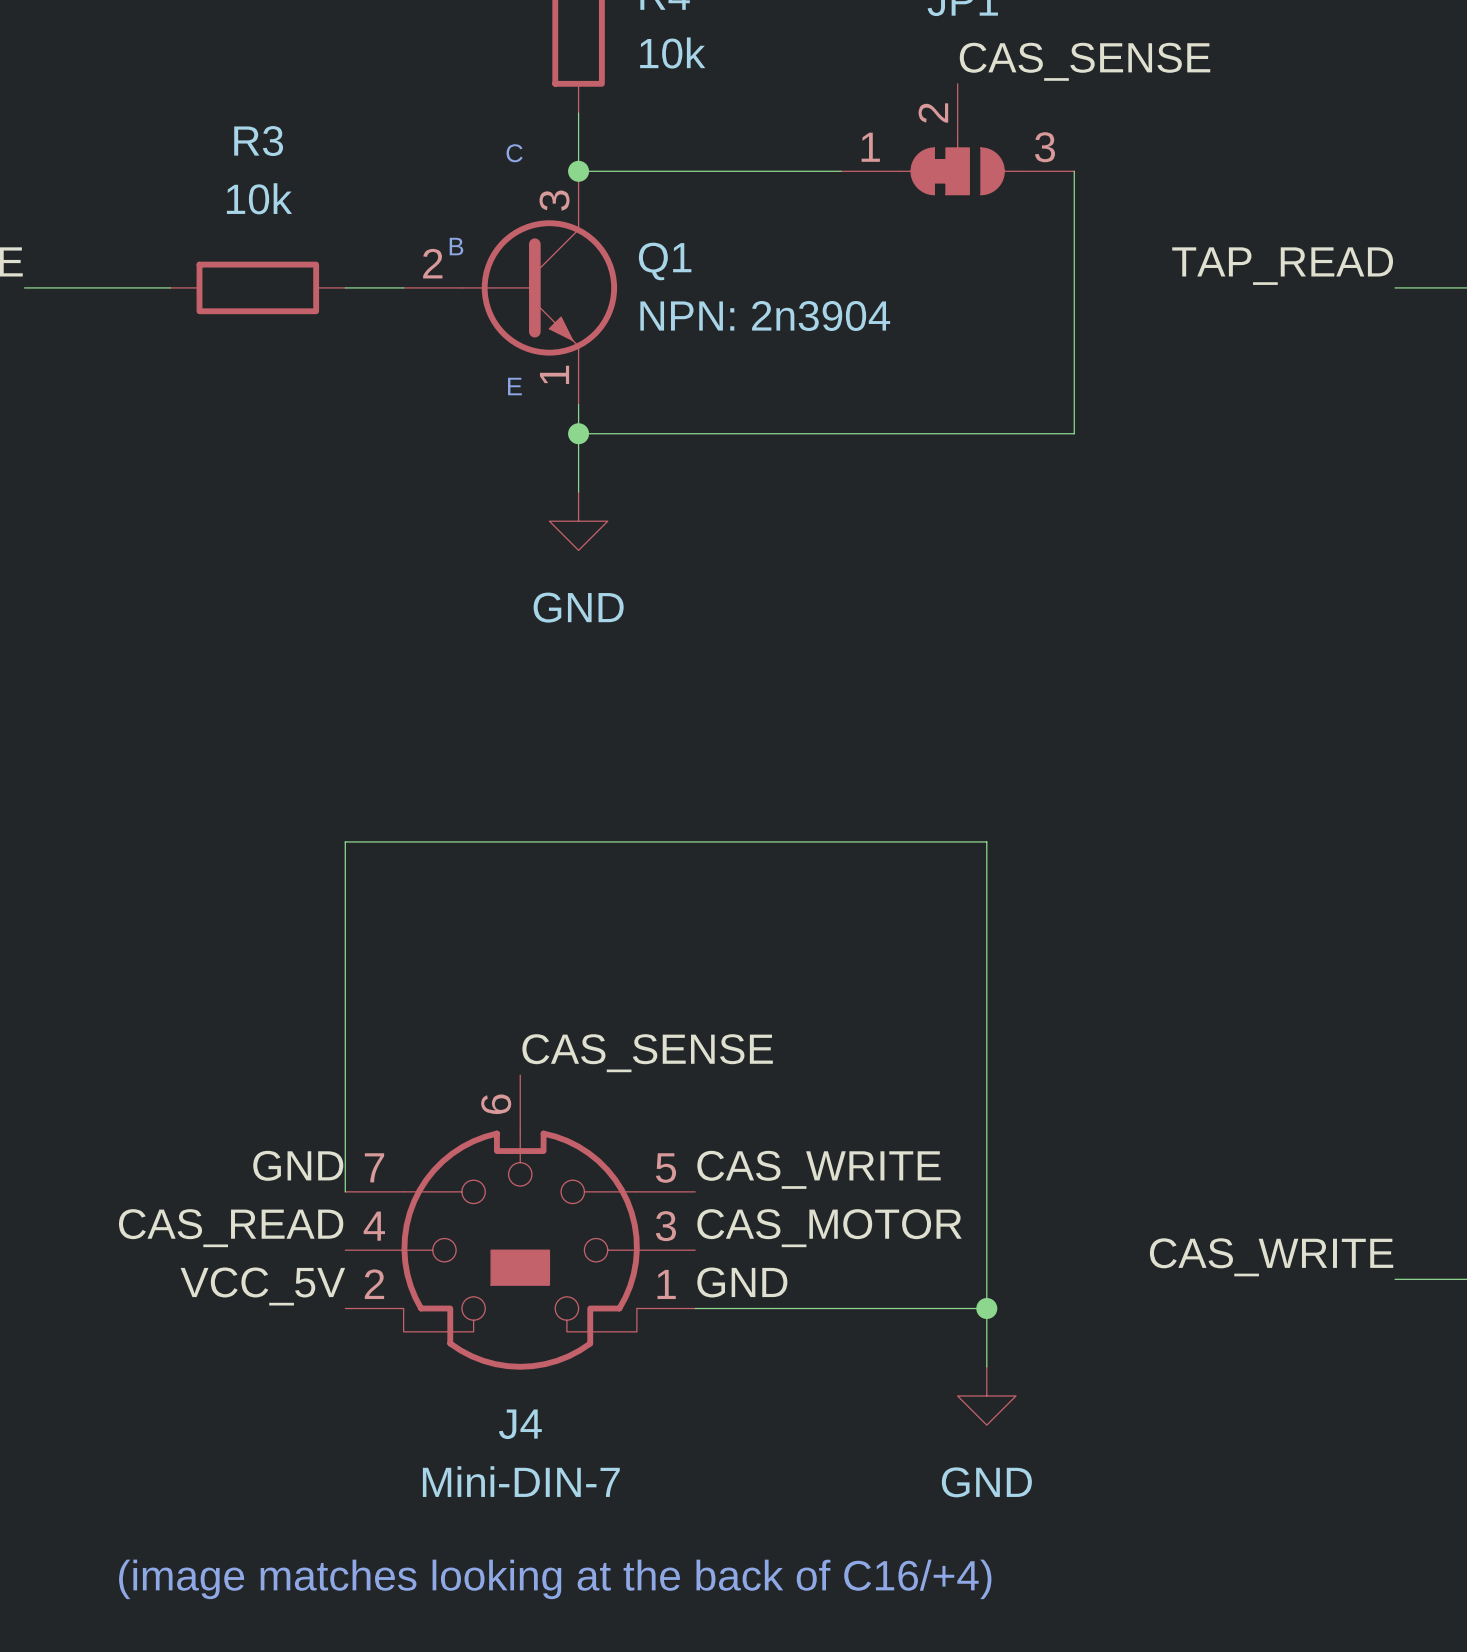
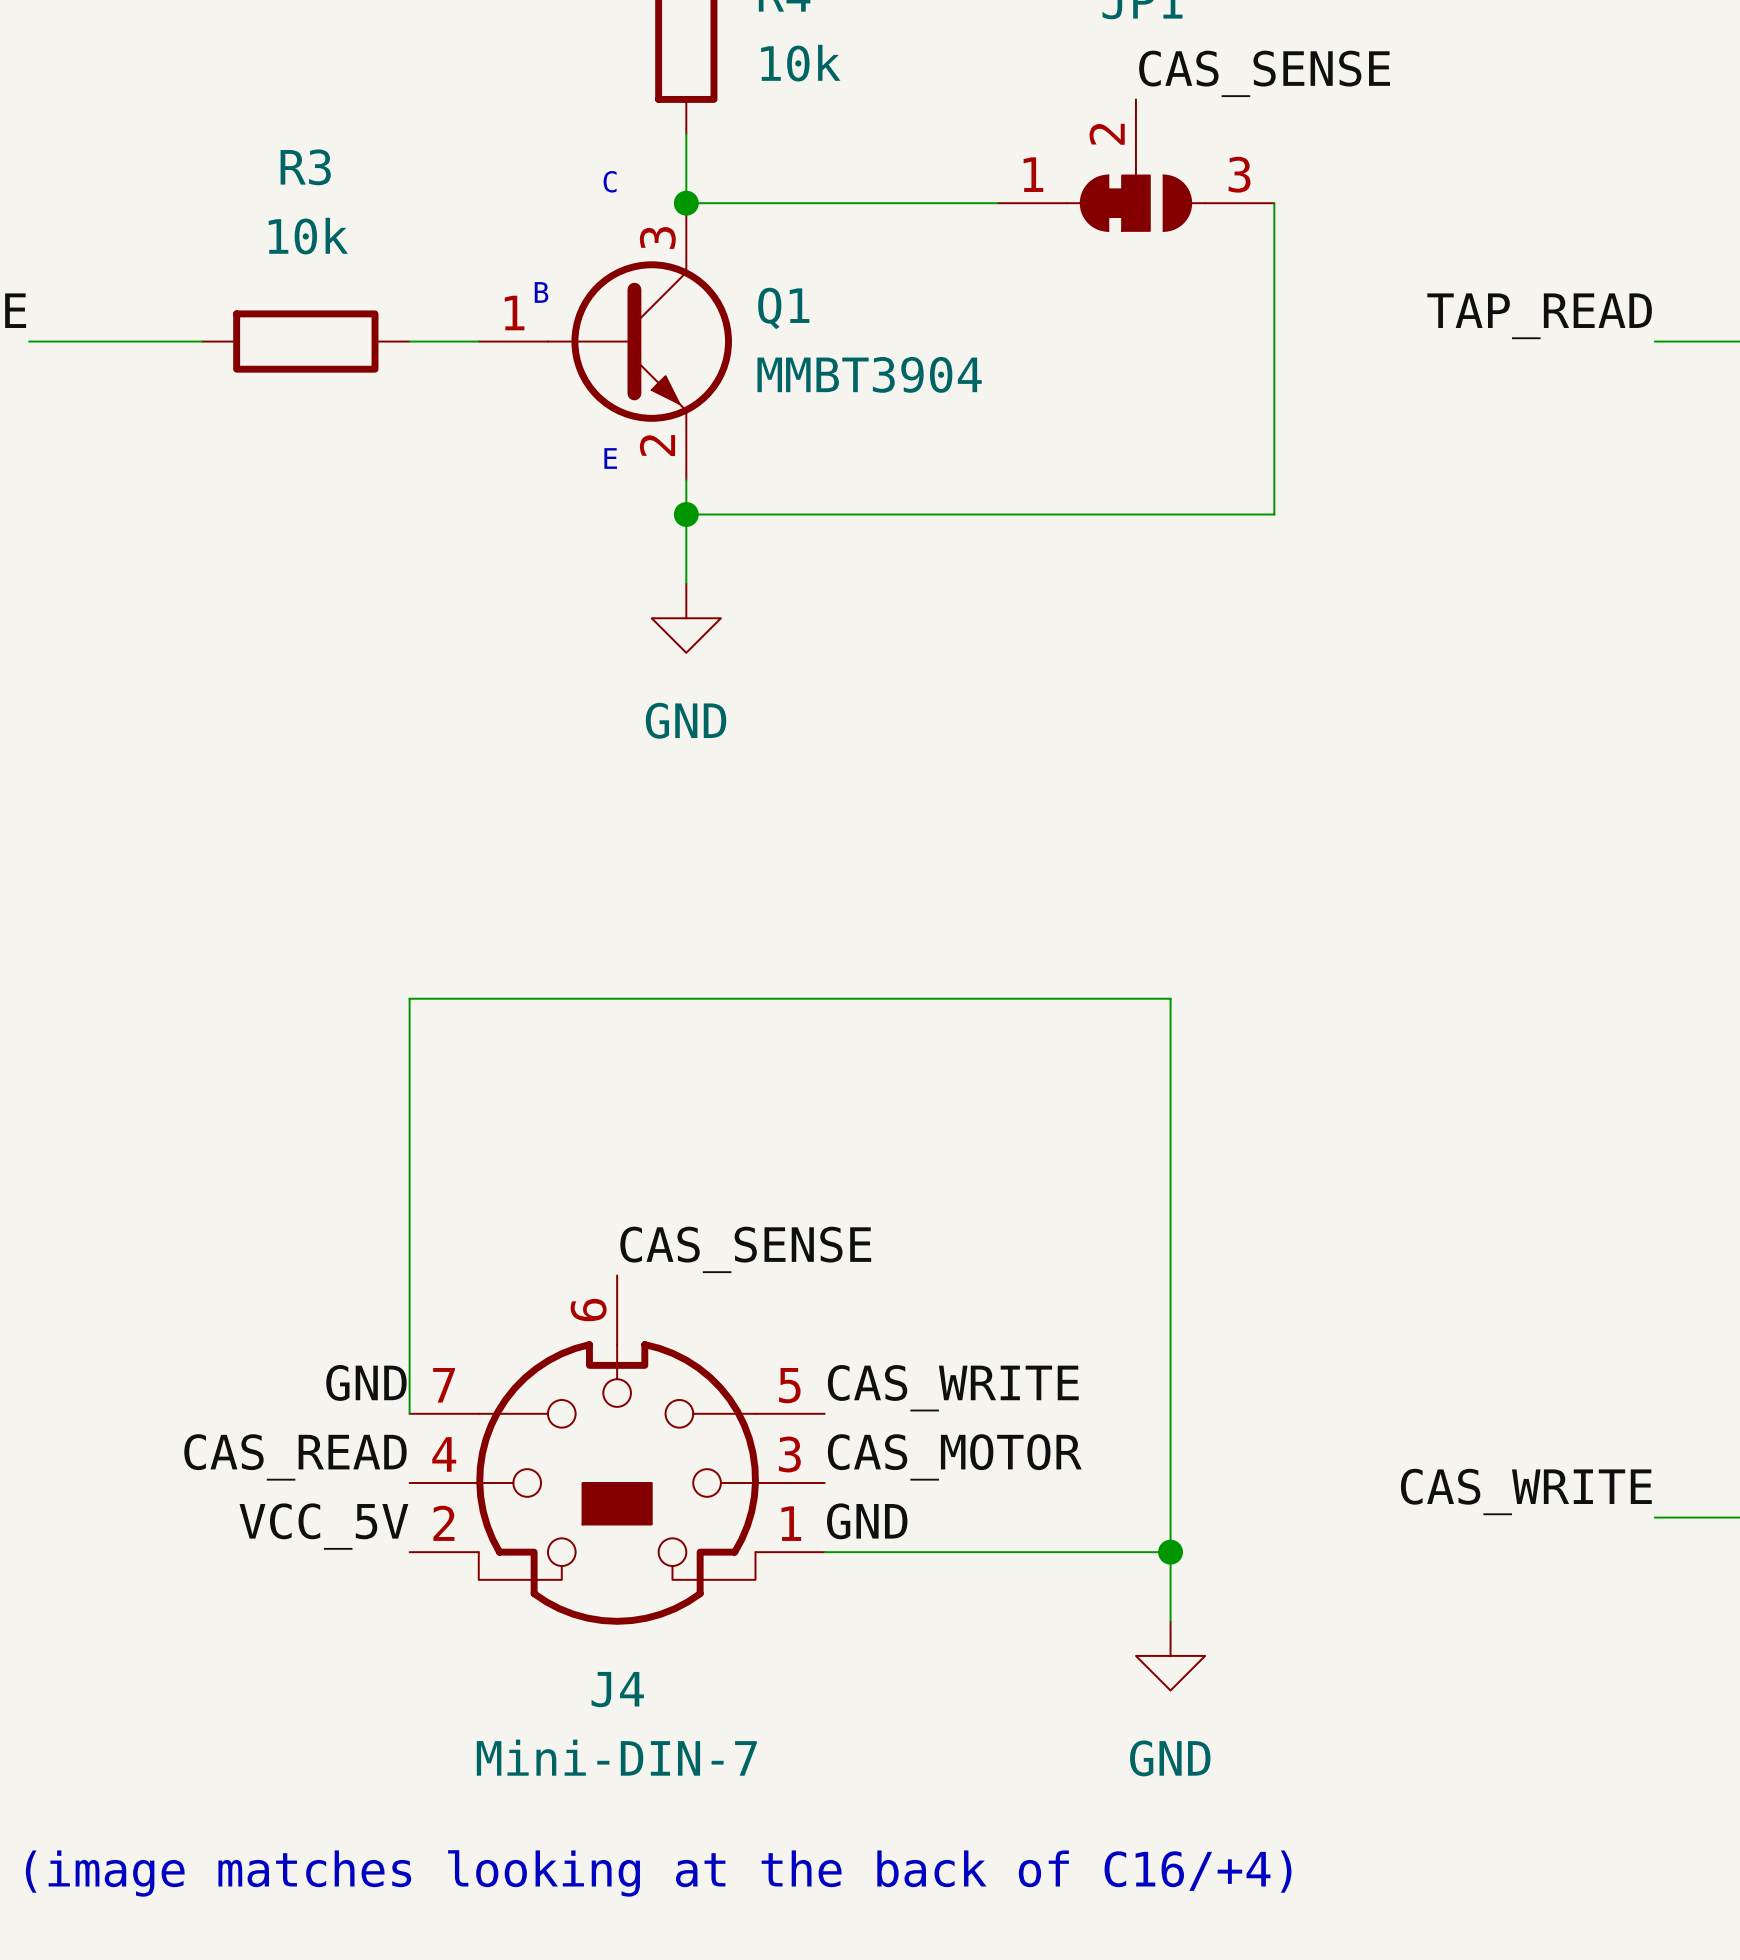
Q1 pin number: 2 (432, 263) -> 1 (514, 313)
Q1 value: NPN: 2n3904 (765, 315) -> MMBT3904 (869, 374)
Q1 pin number: 1 (554, 374) -> 2 (657, 445)

